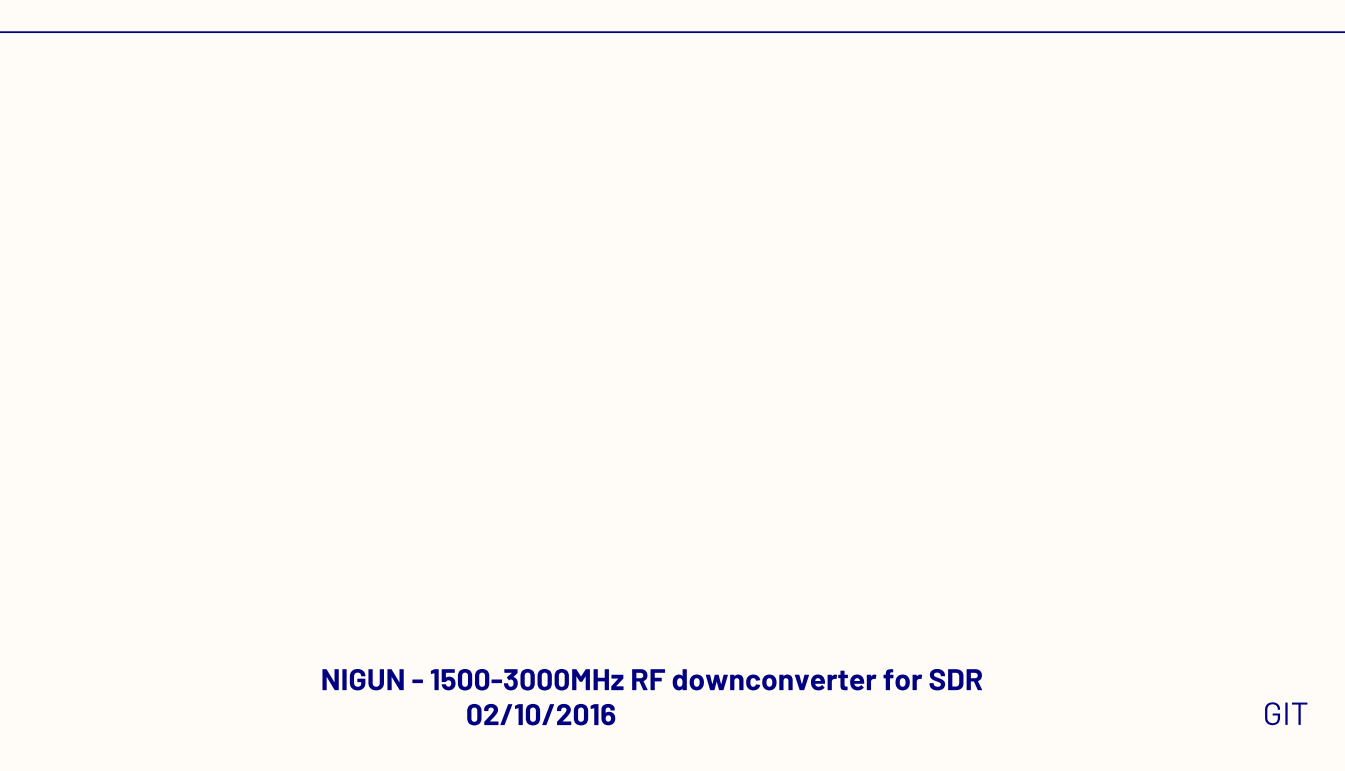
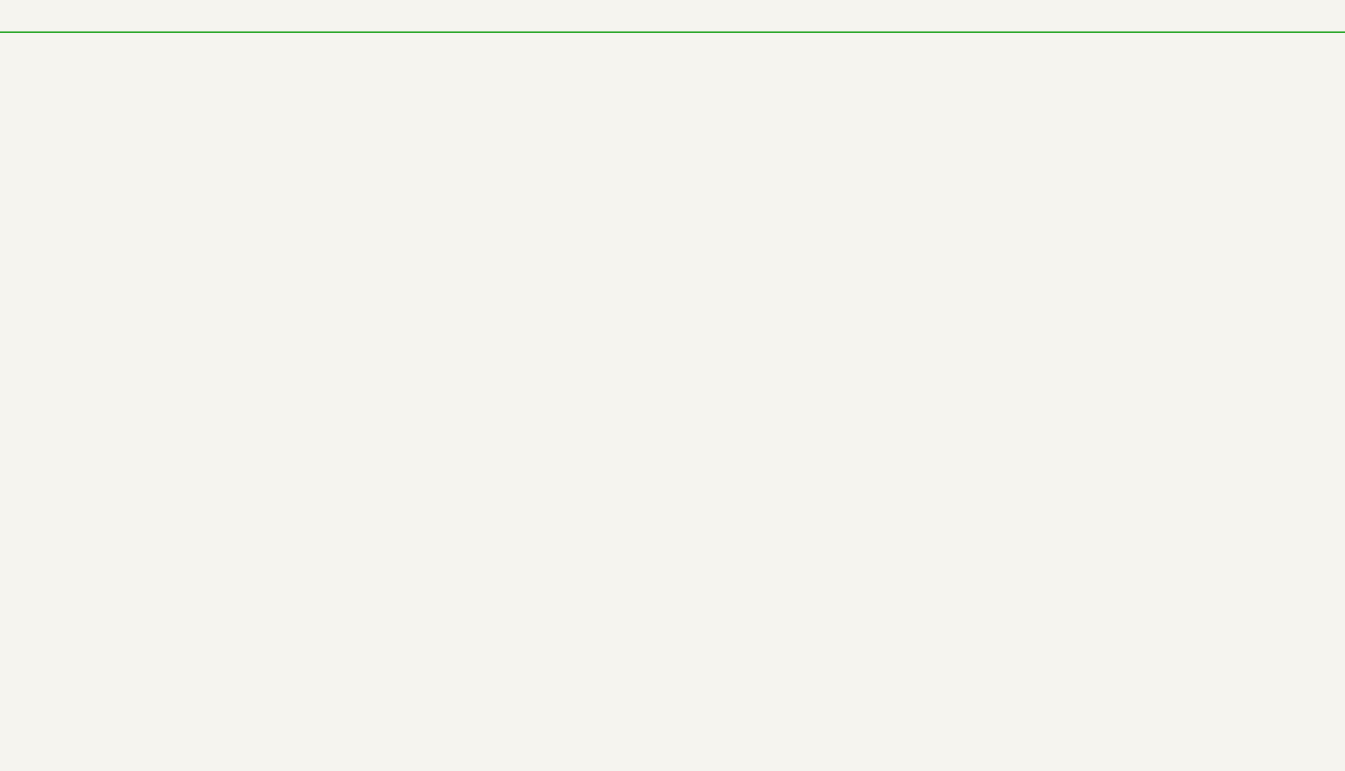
text: NIGUN - 1500-3000MHz RF downconverter for SDR (652, 679) -> none
text: GIT (1286, 713) -> none
text: 02/10/2016 (541, 714) -> none

